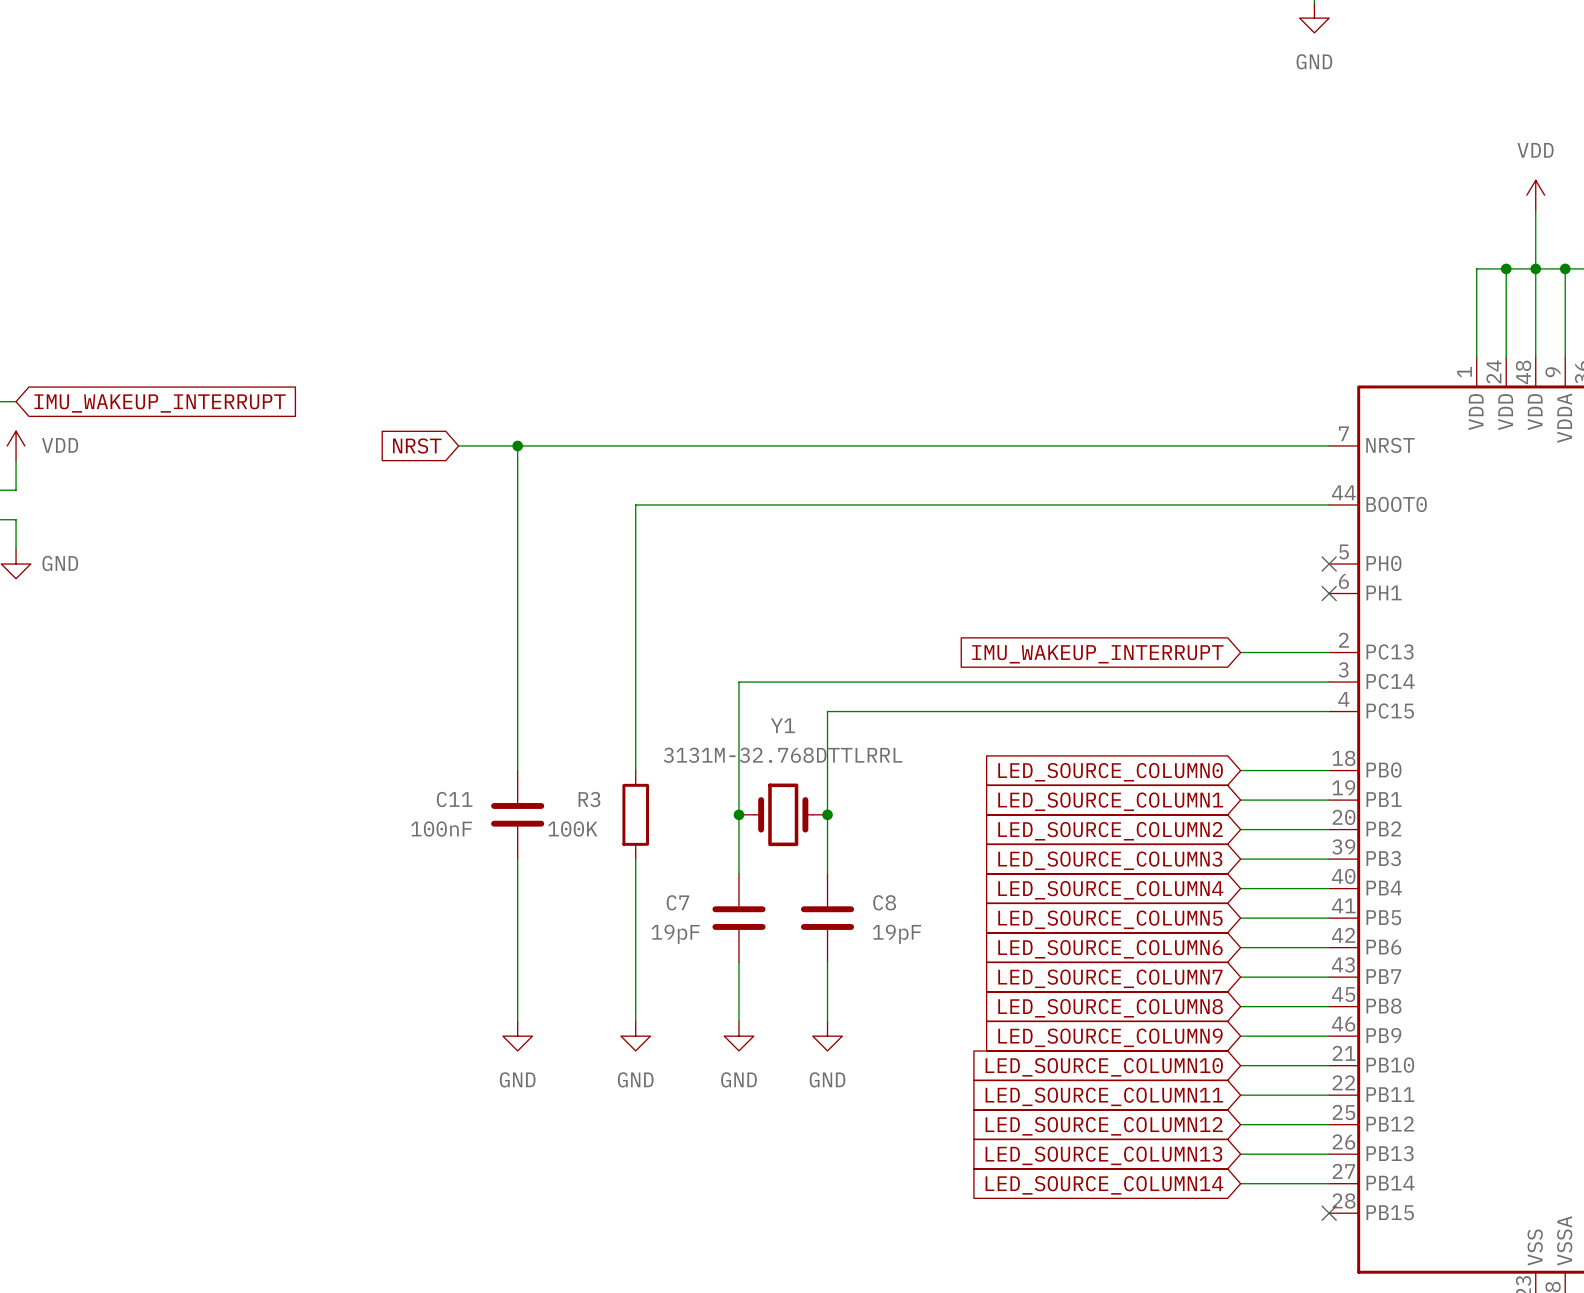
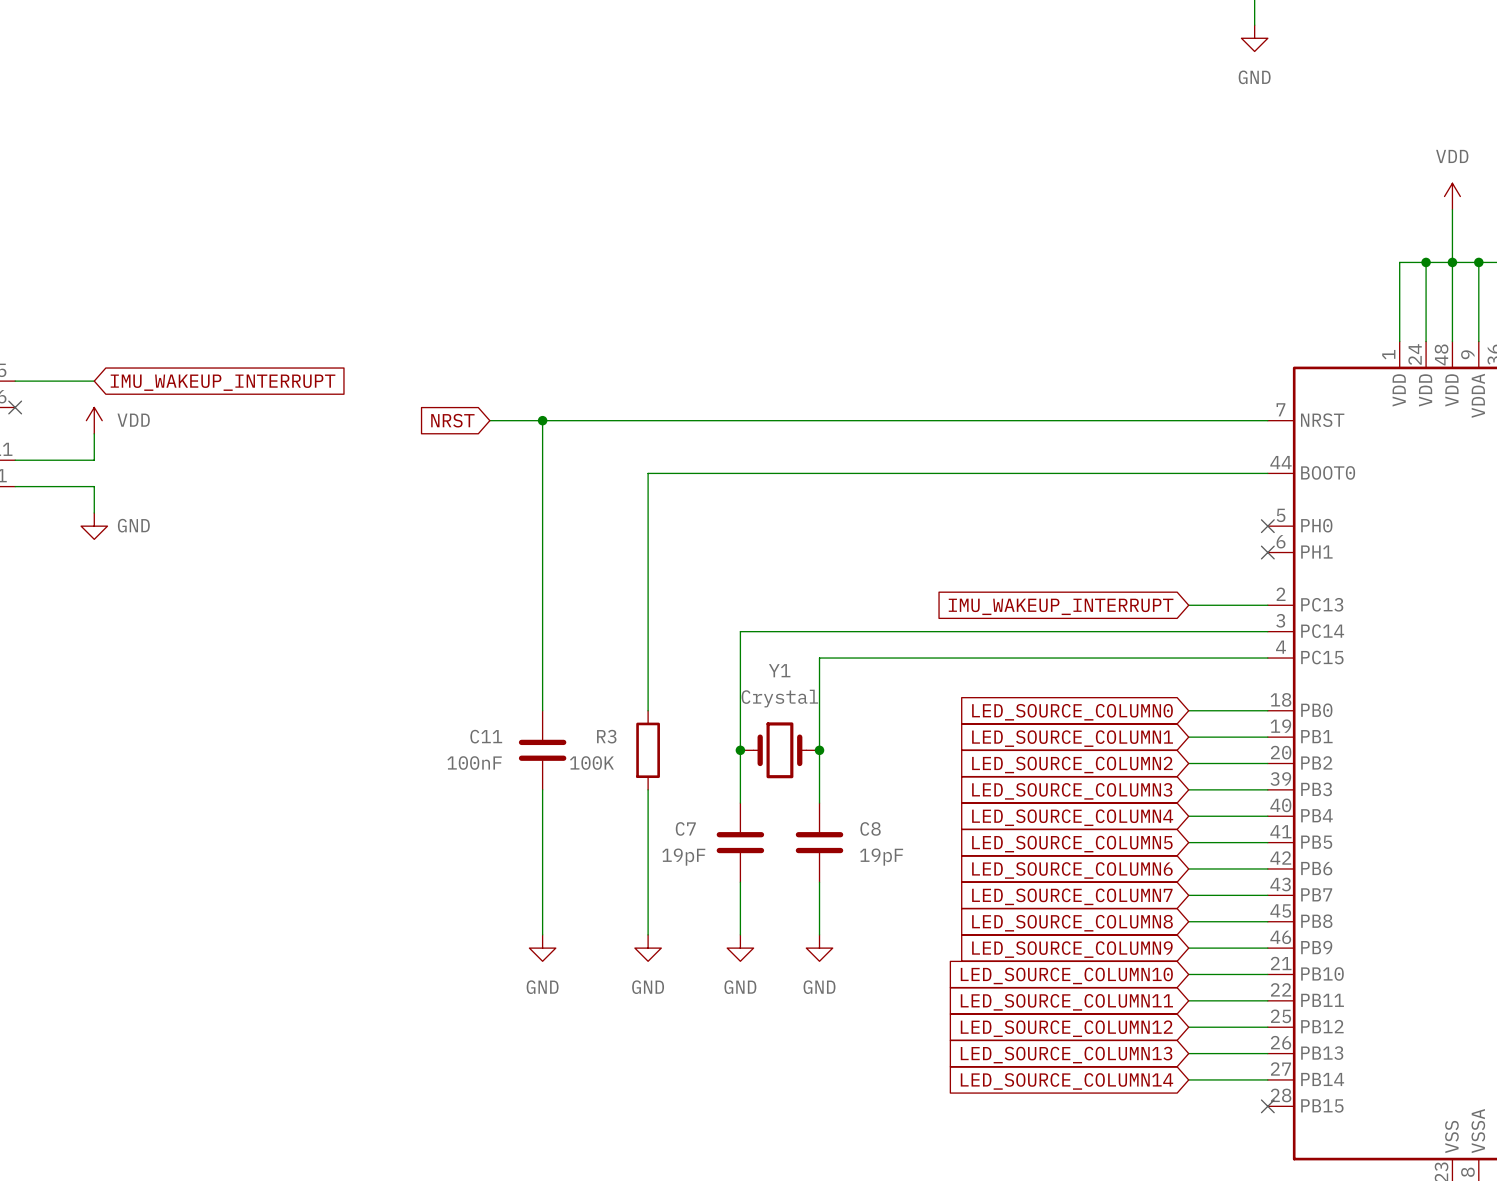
Y1 value: 3131M-32.768DTTLRRL (783, 755) -> Crystal (779, 698)

